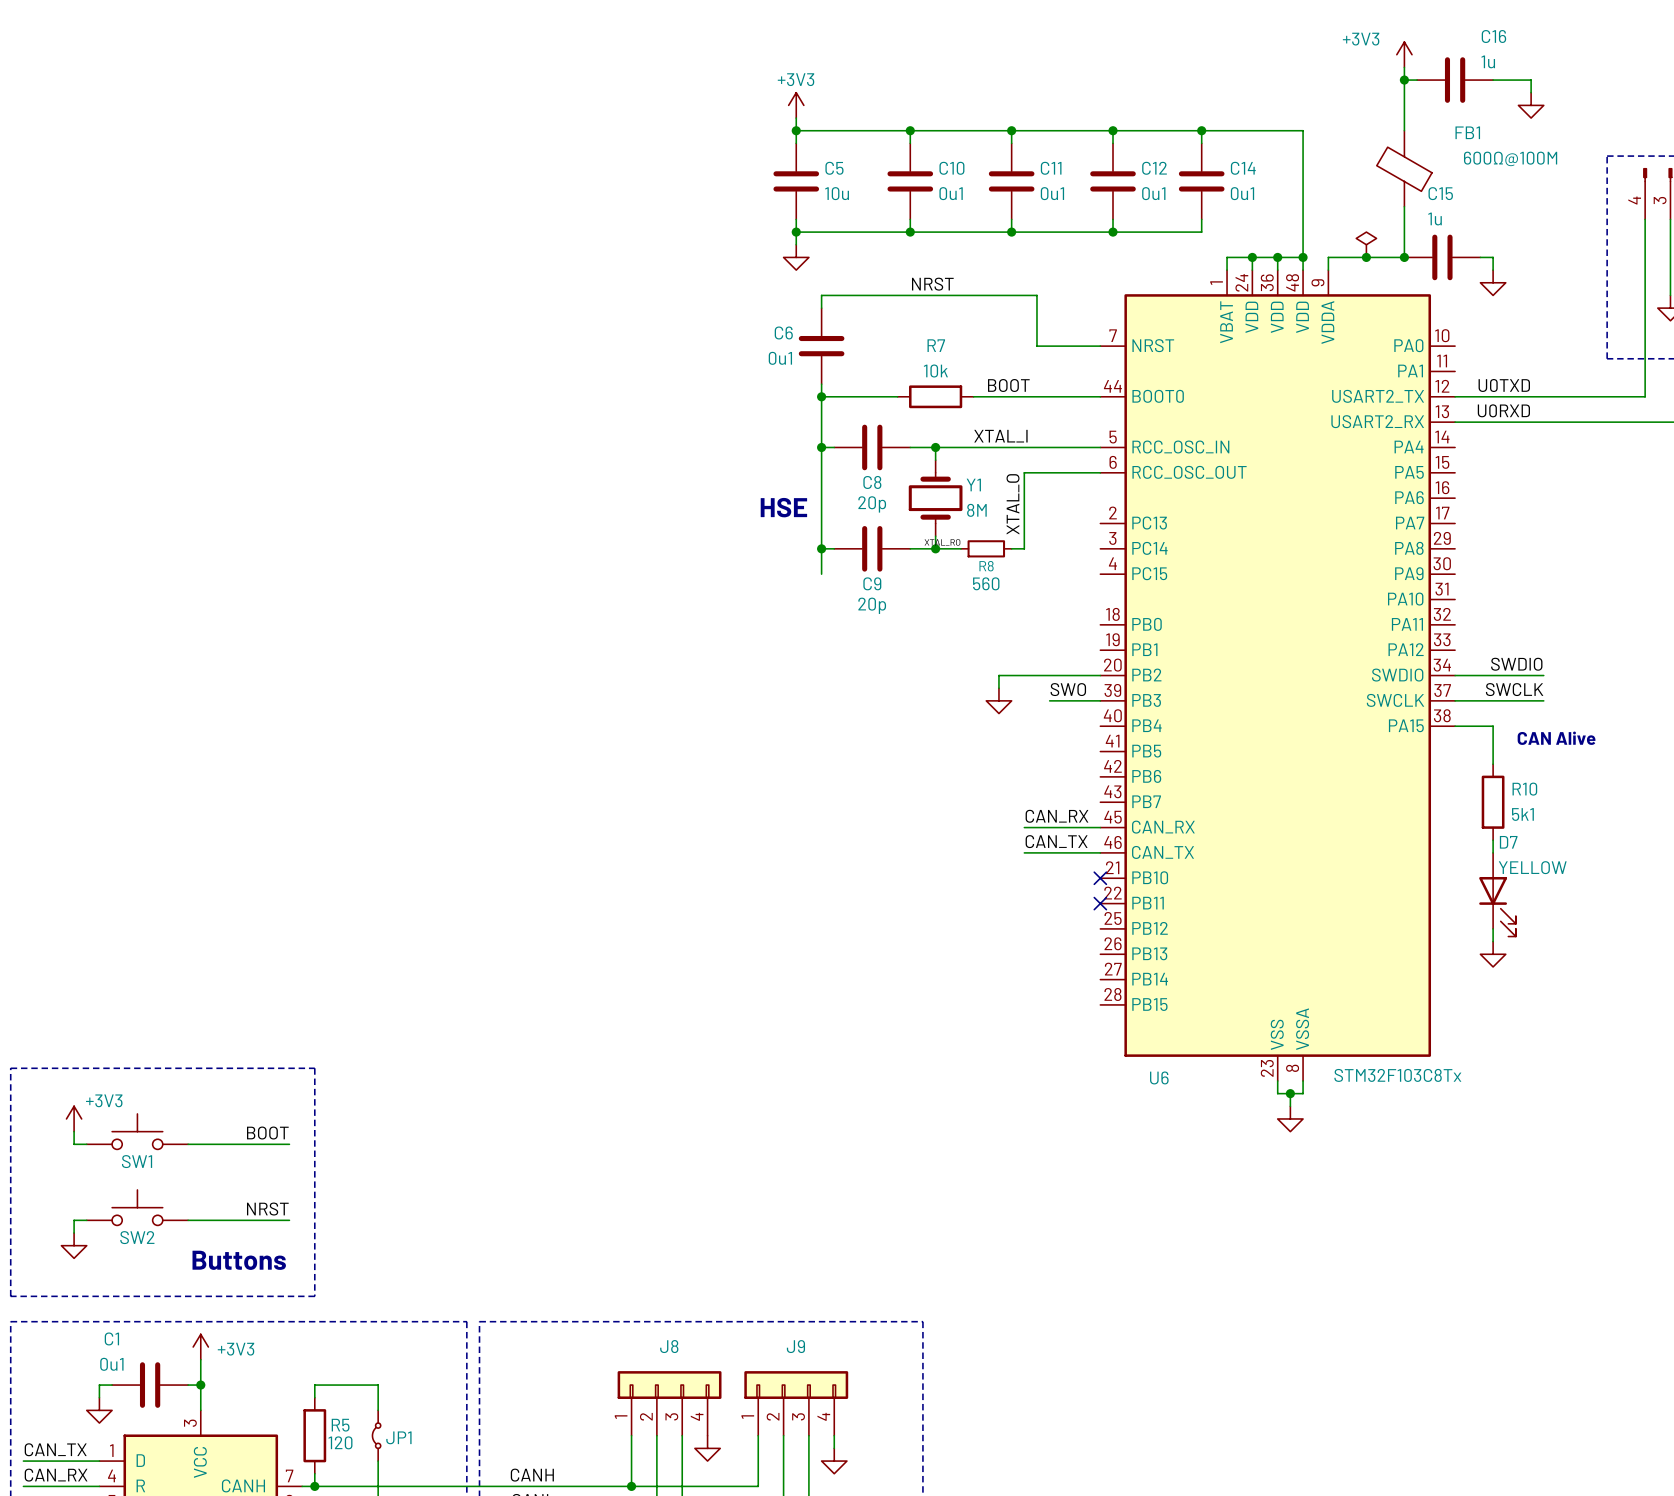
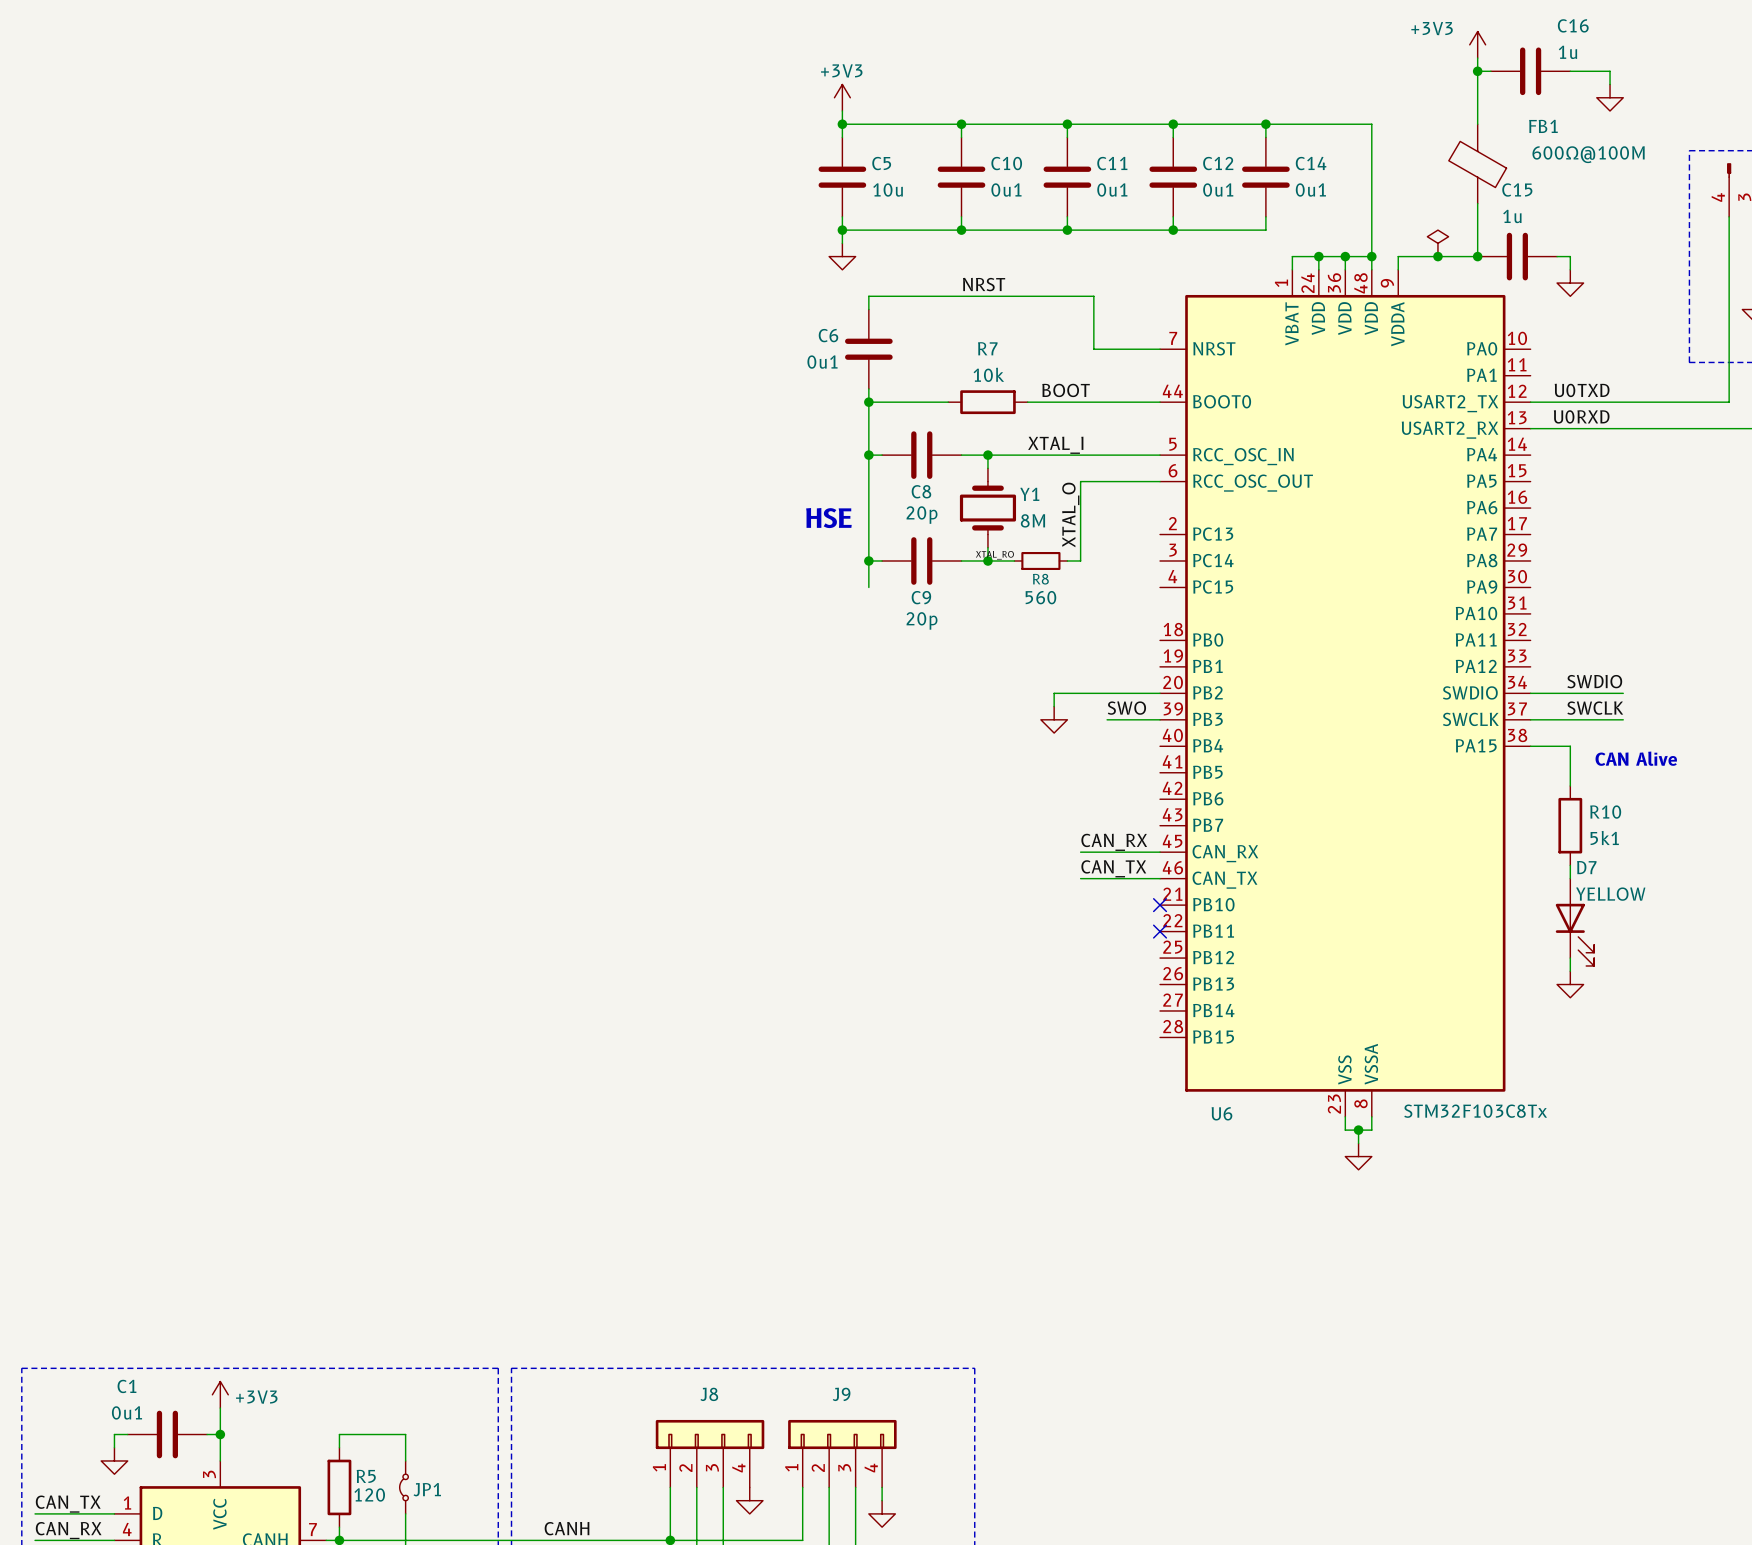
line: (10, 1068) (314, 1068) (314, 1296) (10, 1296) (10, 1068) -> none
power symbol: +3V3 (74, 1118) -> none
wire: (74, 1131) (74, 1144) (86, 1144) -> none
SW1: (137, 1131) -> none
label: BOOT (267, 1133) -> none
wire: (188, 1144) (289, 1144) -> none
SW2: (137, 1207) -> none
label: NRST (267, 1209) -> none
wire: (86, 1220) (74, 1220) (74, 1233) -> none
wire: (188, 1220) (289, 1220) -> none
power symbol: (74, 1245) -> none
text: Buttons (239, 1260) -> none

